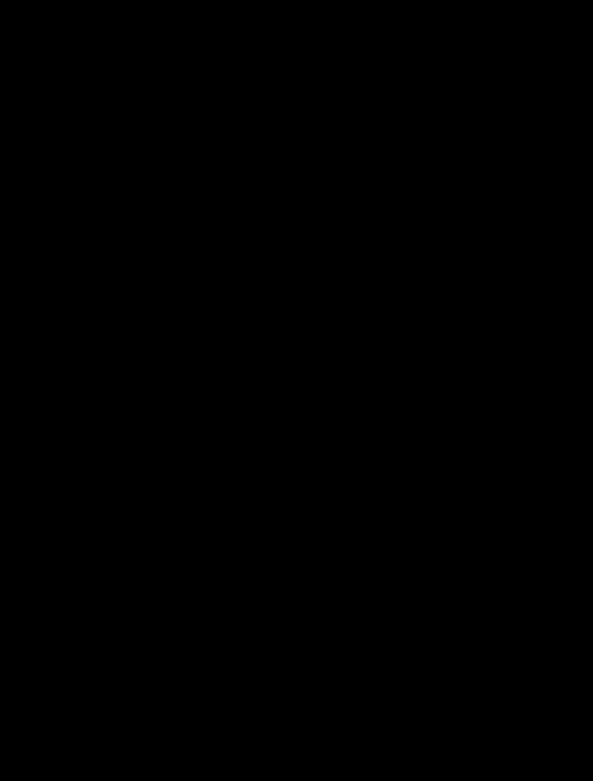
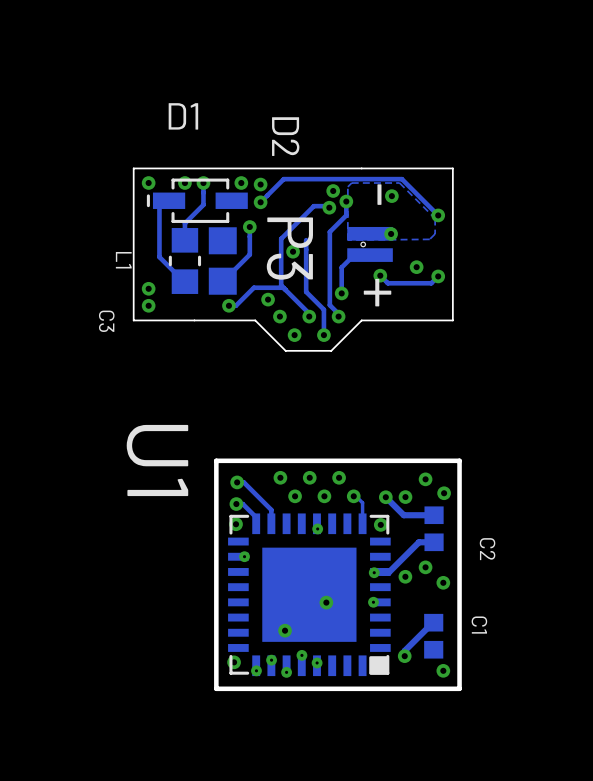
board edge: none -> (452, 168) (452, 320) (361, 320) (331, 350) (285, 350) (255, 320) (133, 320) (133, 168) (452, 168)
via: none -> (148, 183)
via: none -> (184, 183)
track: none -> (203, 183) (203, 204) (184, 223) (184, 240)
via: none -> (203, 183)
via: none -> (241, 183)
zone outline: none -> (399, 183) (351, 183) (347, 186) (347, 240) (429, 239) (435, 233) (435, 218) (399, 183)
via: none -> (260, 184)
via: none -> (333, 190)
text: none -> - (379, 194)
via: none -> (391, 196)
track: none -> (159, 200) (159, 257) (184, 281)
D1: none -> (197, 200)
track: none -> (346, 200) (346, 215) (329, 231) (329, 305) (338, 313) (338, 316)
via: none -> (346, 201)
track: none -> (260, 202) (283, 179) (401, 179) (438, 215)
via: none -> (260, 202)
track: none -> (329, 206) (313, 206) (281, 238) (281, 285) (309, 313) (309, 316)
via: none -> (329, 207)
via: none -> (438, 215)
track: none -> (249, 227) (249, 254) (223, 281)
via: none -> (249, 227)
via: none -> (391, 233)
track: none -> (306, 240) (306, 291) (323, 309) (323, 335)
D2: none -> (370, 244)
text: none -> P3 (289, 248)
via: none -> (293, 251)
track: none -> (370, 255) (354, 255) (341, 267) (341, 293)
C3: none -> (184, 260)
L1: none -> (222, 260)
via: none -> (416, 267)
track: none -> (380, 275) (387, 283) (431, 283) (438, 276)
via: none -> (380, 275)
via: none -> (438, 276)
track: none -> (283, 287) (253, 287) (235, 305) (228, 305)
via: none -> (148, 288)
text: none -> + (377, 292)
via: none -> (341, 293)
via: none -> (268, 299)
via: none -> (148, 305)
via: none -> (228, 305)
via: none -> (279, 316)
via: none -> (309, 316)
via: none -> (338, 316)
via: none -> (294, 335)
via: none -> (323, 335)
board edge: none -> (459, 460) (216, 460) (216, 688) (459, 688) (459, 460)
via: none -> (280, 477)
via: none -> (309, 477)
via: none -> (339, 477)
via: none -> (425, 479)
track: none -> (237, 482) (243, 482) (271, 509) (271, 523)
via: none -> (237, 482)
via: none -> (444, 493)
track: none -> (355, 495) (362, 502) (362, 523)
via: none -> (295, 496)
via: none -> (324, 496)
via: none -> (353, 496)
track: none -> (385, 497) (403, 515) (434, 515)
via: none -> (385, 497)
via: none -> (405, 497)
track: none -> (236, 504) (242, 504) (256, 517) (256, 523)
via: none -> (236, 504)
via: none -> (236, 524)
via: none -> (380, 524)
via: none -> (317, 528)
C1: none -> (434, 528)
track: none -> (434, 542) (418, 542) (388, 572) (374, 572)
via: none -> (244, 556)
via: none -> (425, 567)
via: none -> (374, 572)
via: none -> (405, 576)
via: none -> (443, 582)
U1: none -> (309, 594)
via: none -> (326, 602)
via: none -> (373, 602)
track: none -> (433, 622) (404, 650) (404, 656)
via: none -> (285, 630)
C2: none -> (433, 636)
via: none -> (301, 655)
drawing: none -> [369, 656, 388, 675]
via: none -> (404, 656)
via: none -> (271, 660)
via: none -> (234, 662)
via: none -> (317, 662)
via: none -> (256, 670)
via: none -> (443, 670)
via: none -> (286, 672)

